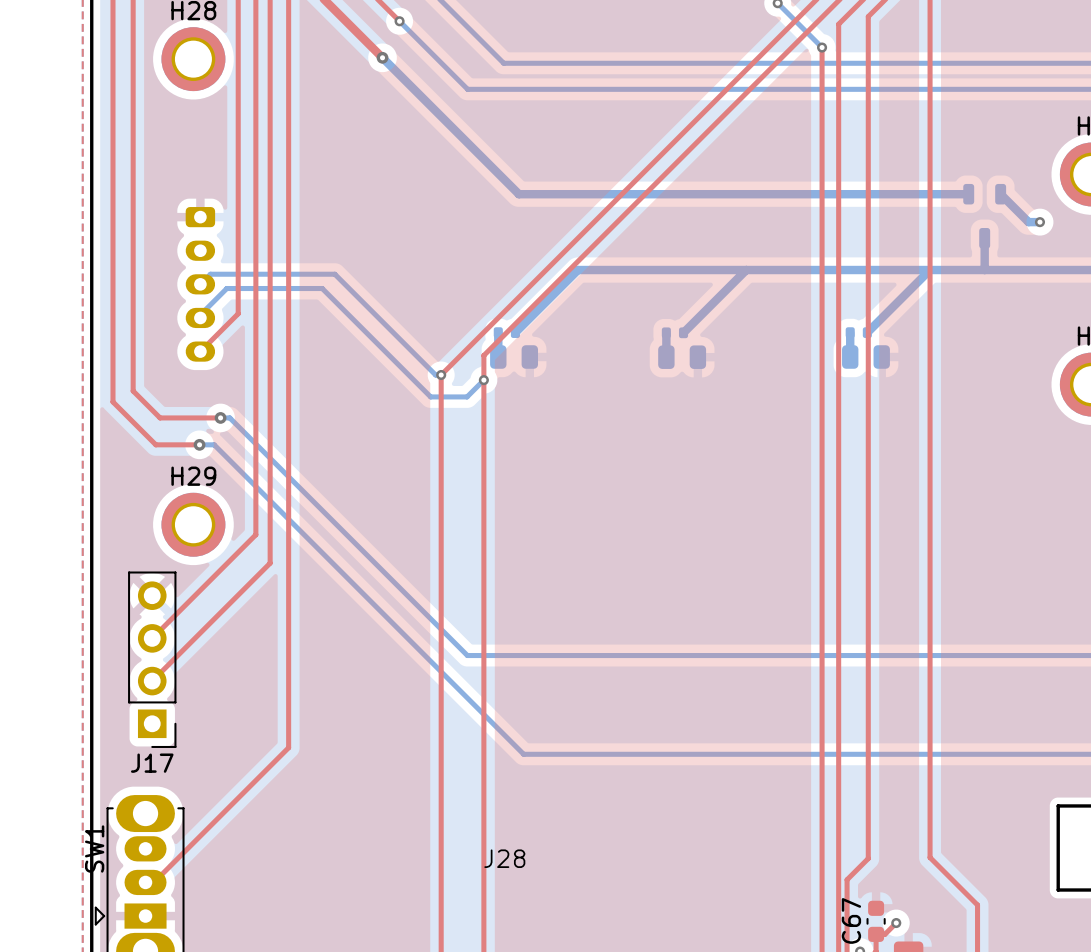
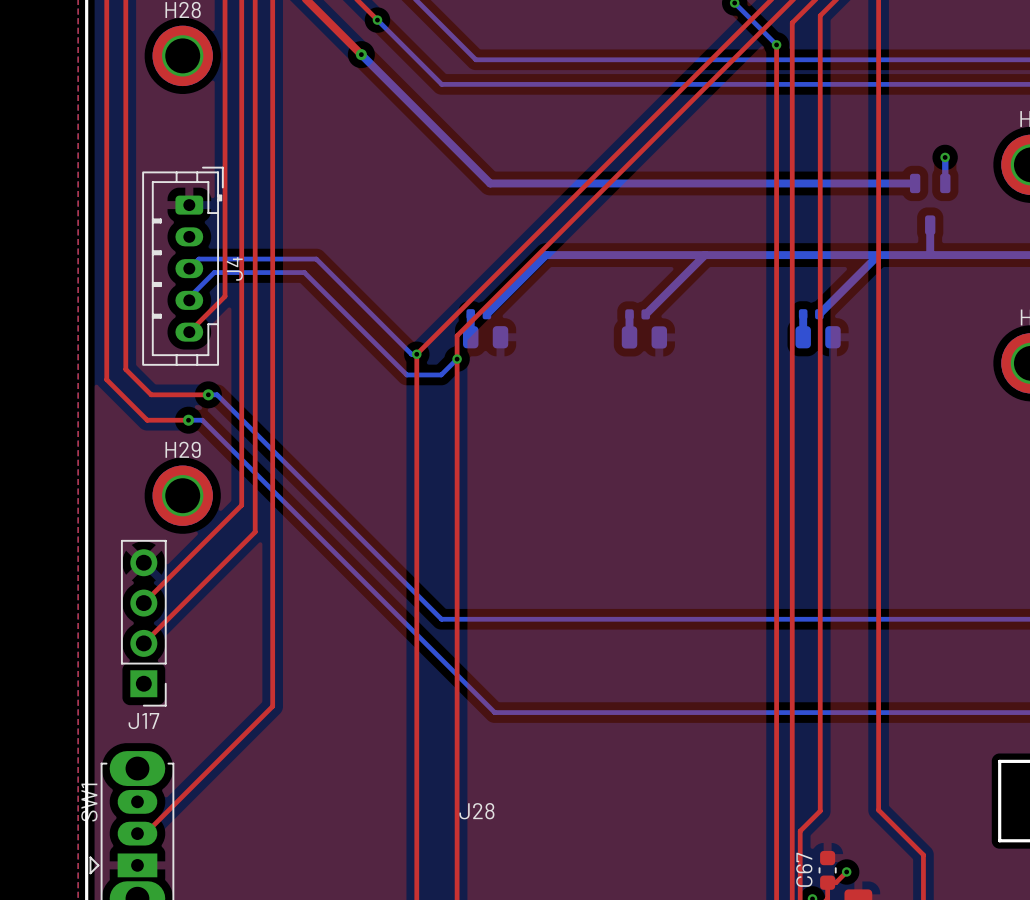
bottom track: (1000, 194) (1028, 222) (1039, 222) -> (945, 183) (945, 157)
via position: (1039, 222) -> (945, 157)
J4 side: bottom (200, 284) -> top (182, 266)

